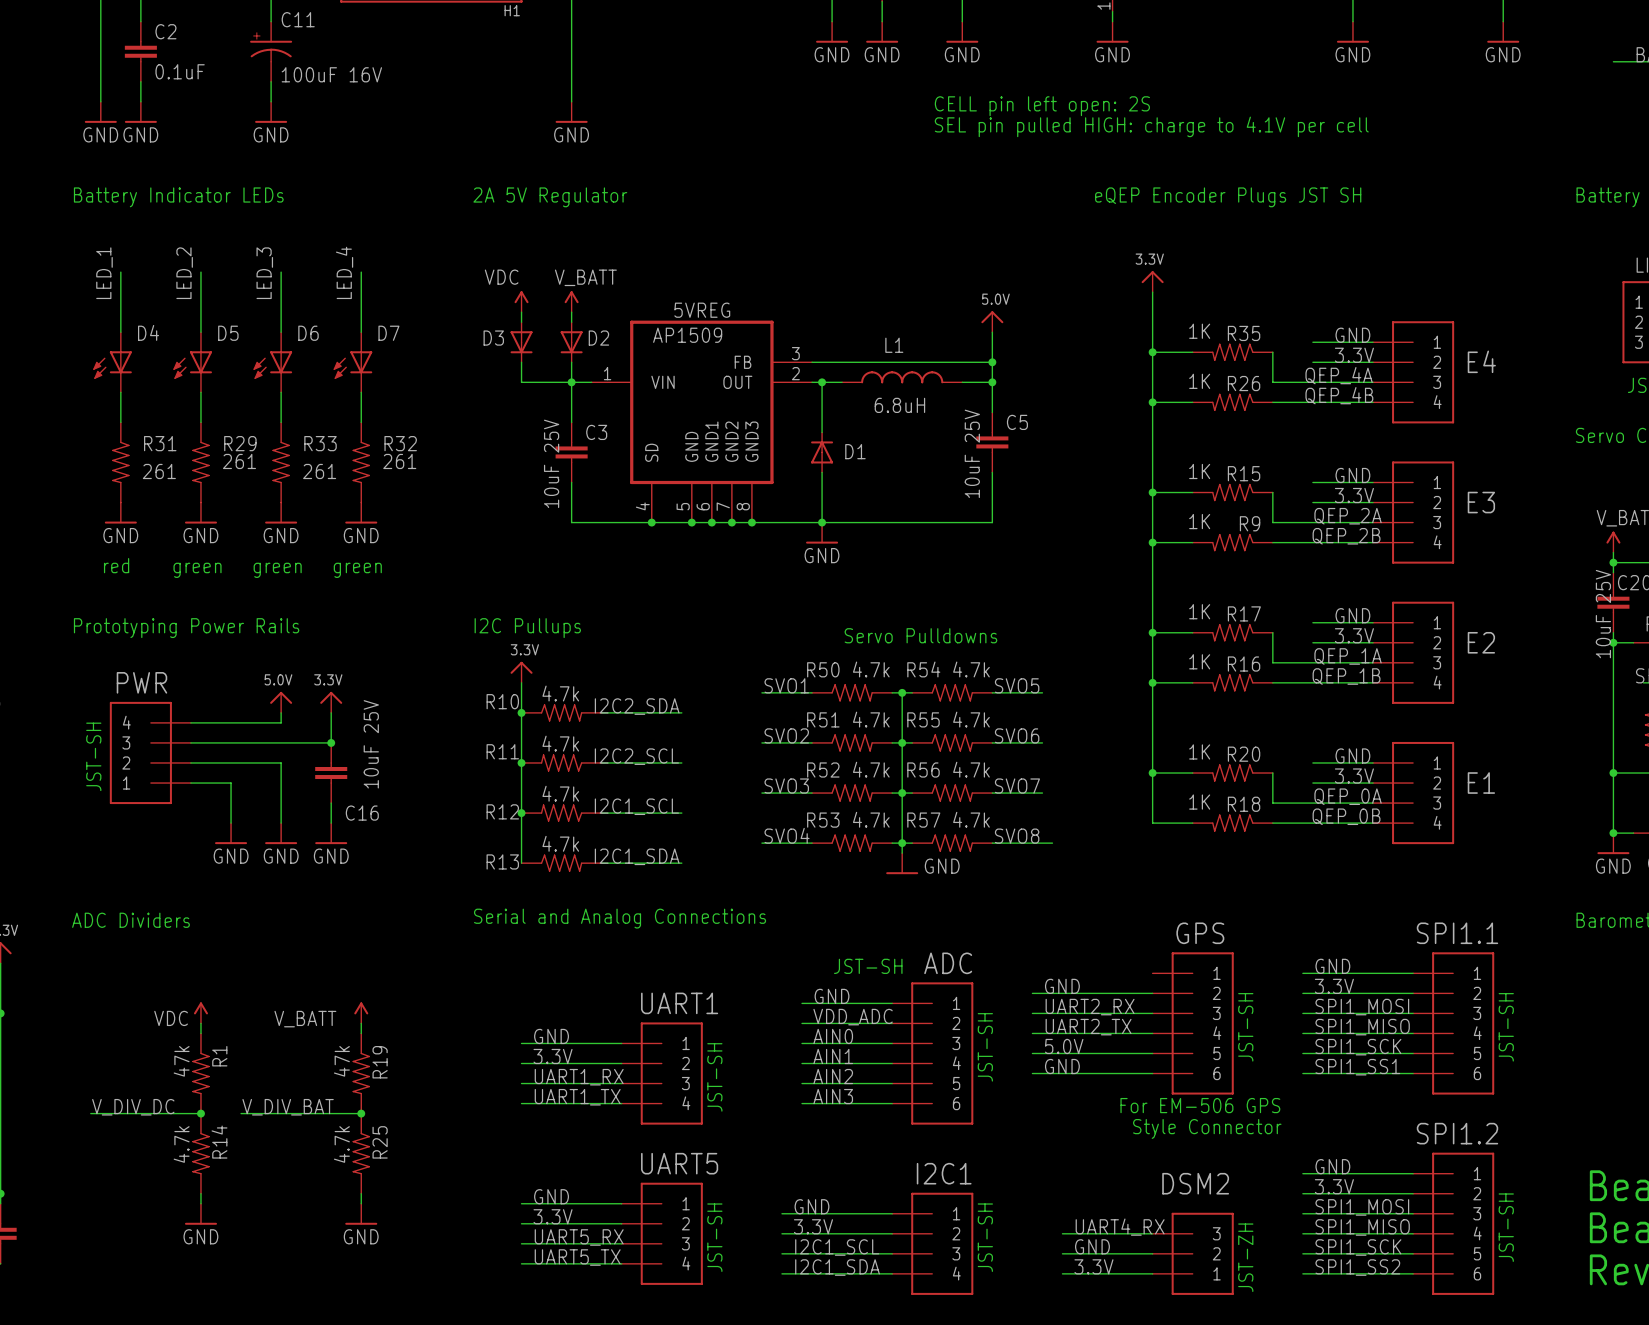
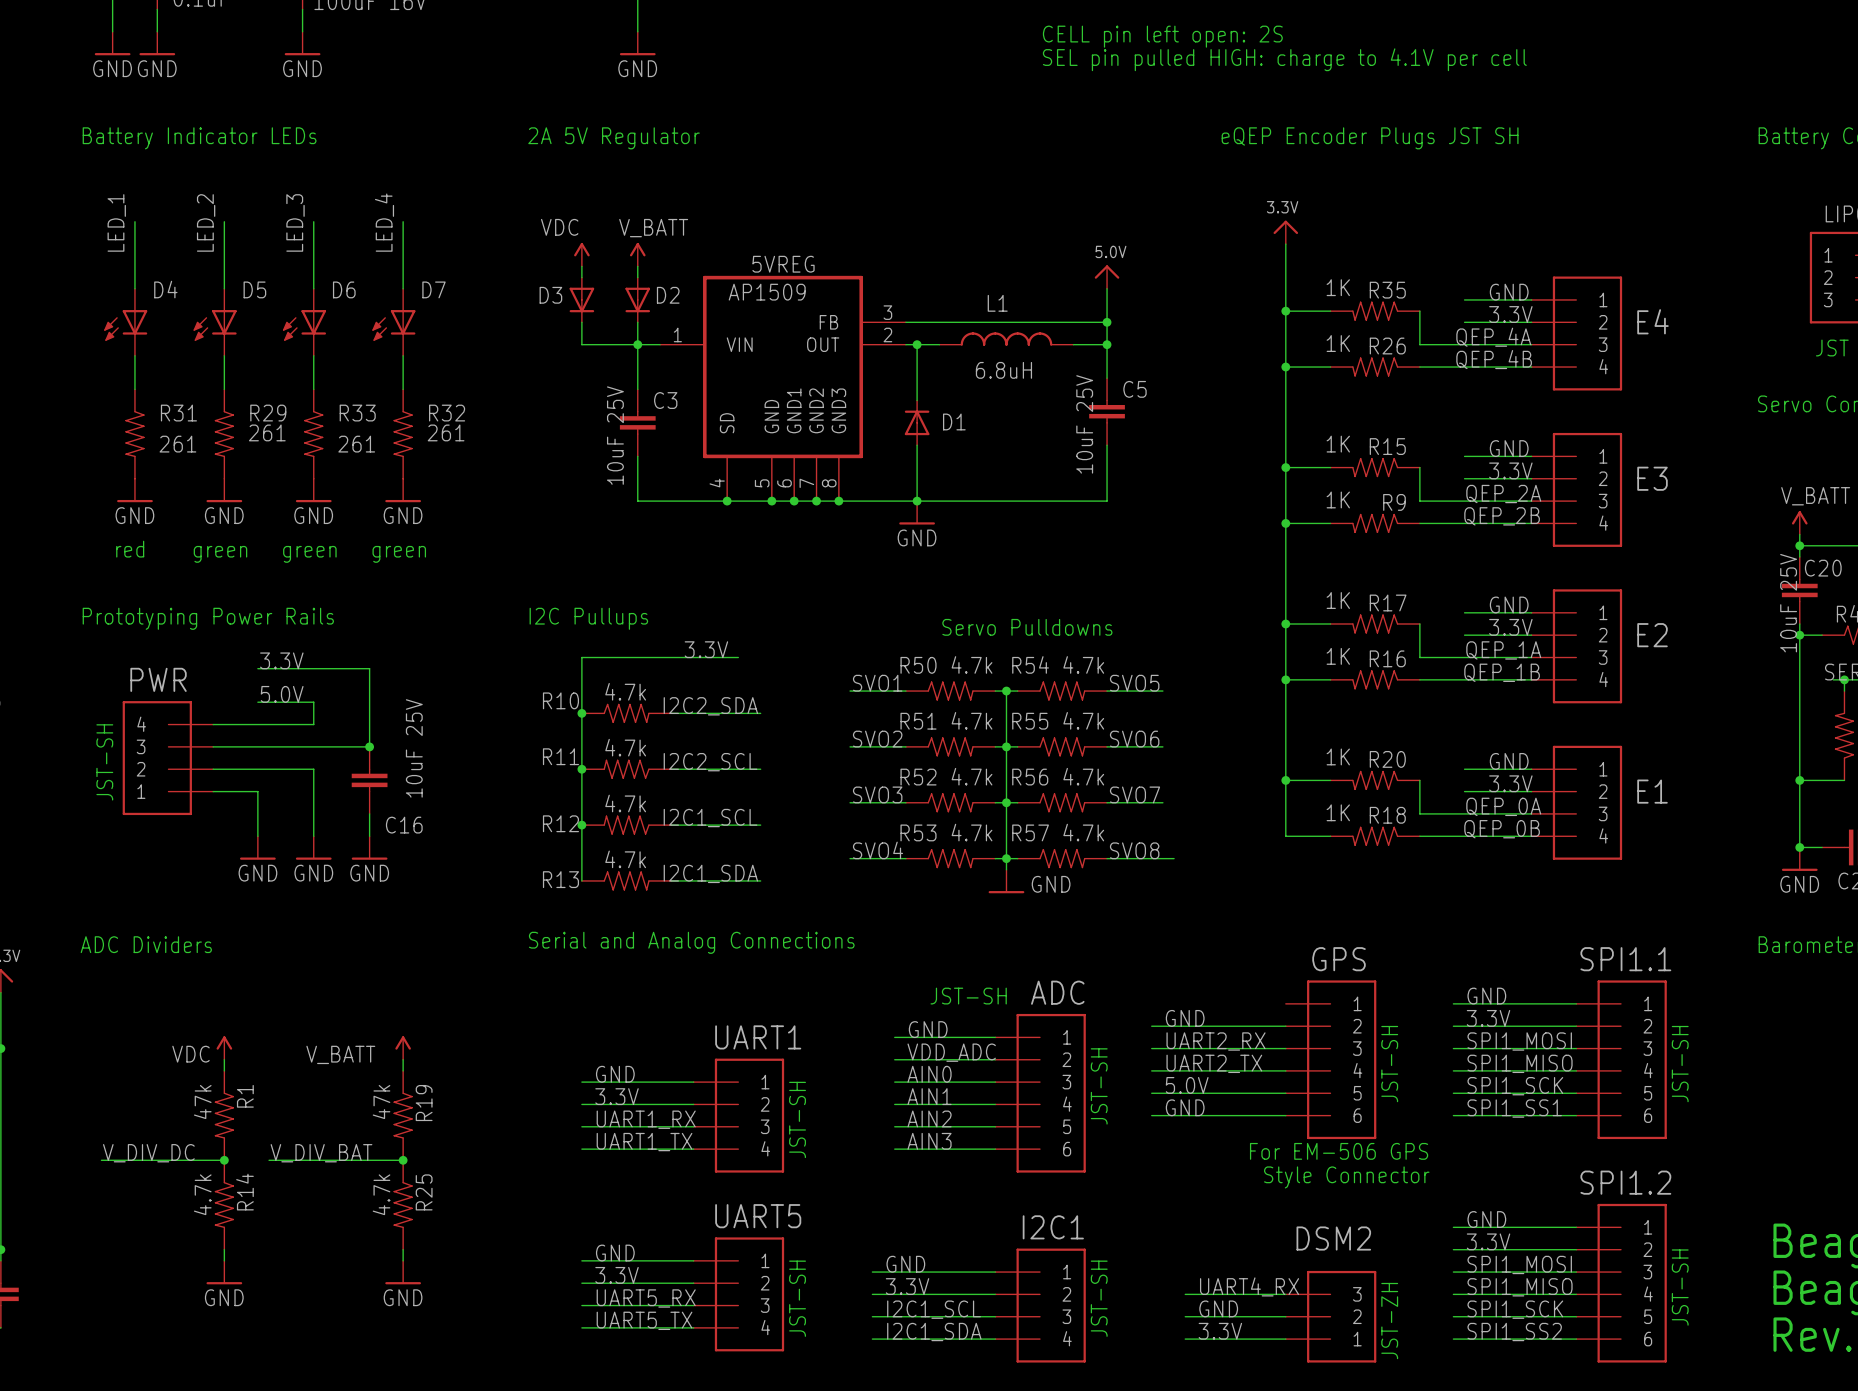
label: none -> 3.3V (706, 649)
wire: none -> (738, 657) (581, 657) (581, 679)
label: none -> 3.3V (281, 660)
wire: none -> (257, 668) (369, 668) (369, 713)
power symbol: 3.3V (521, 672) -> none
label: none -> 5.0V (282, 694)
wire: none -> (257, 702) (313, 702) (313, 713)
power symbol: 5.0V (281, 702) -> none
power symbol: 3.3V (331, 702) -> none

